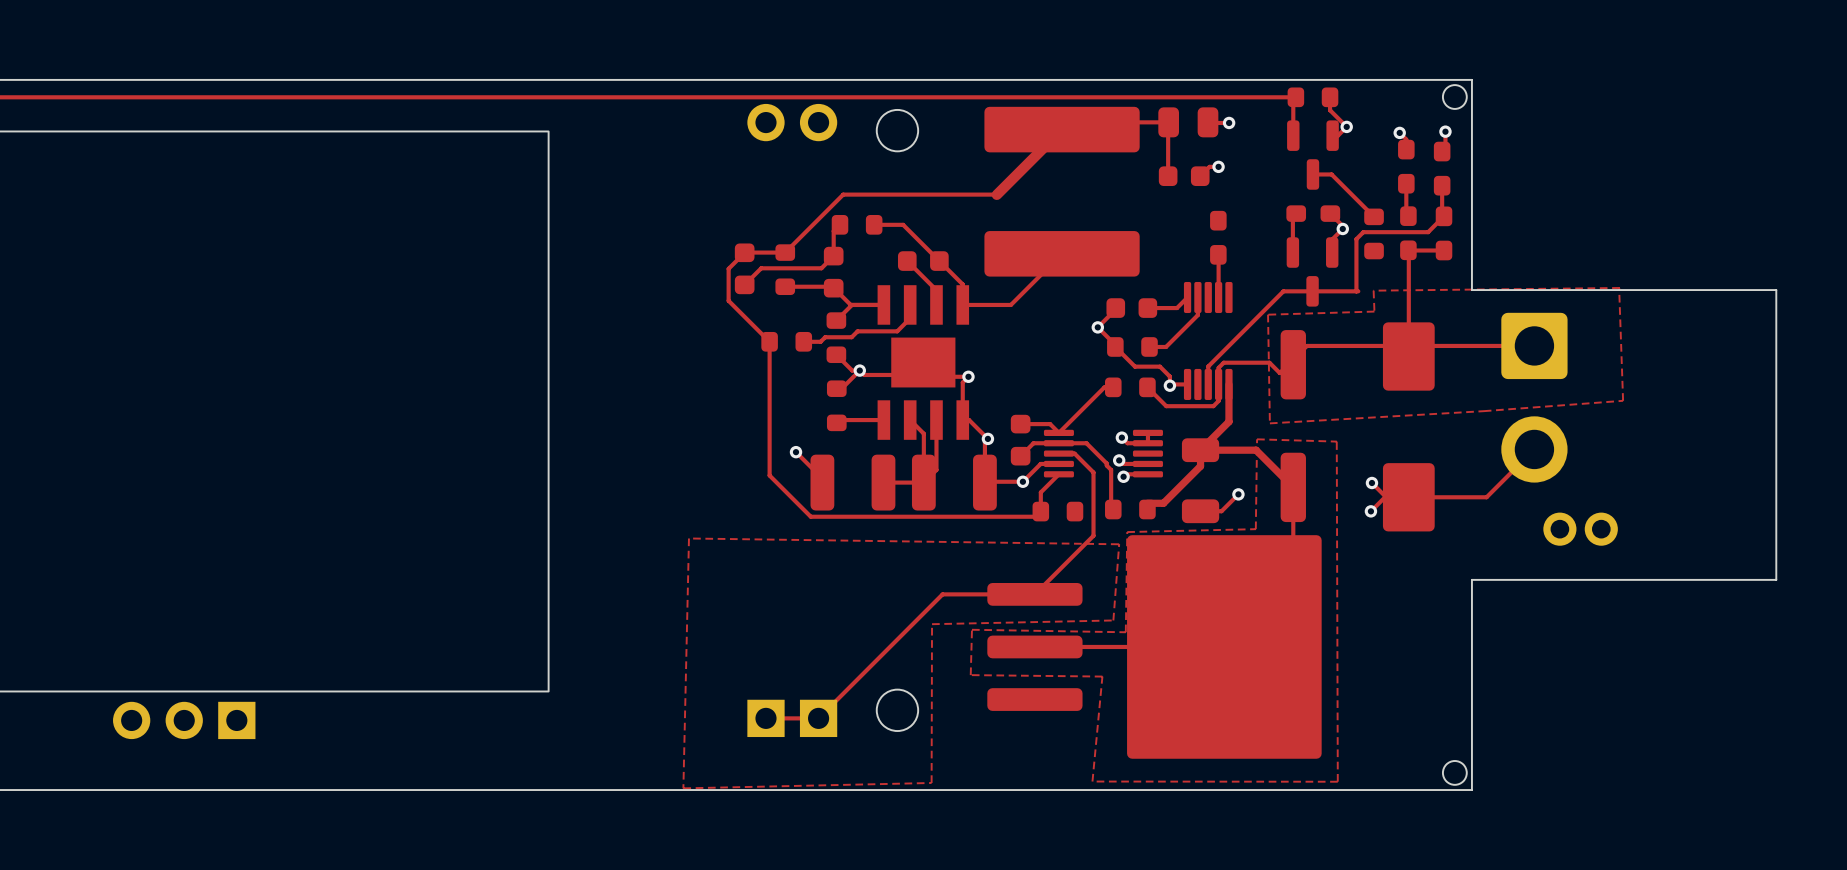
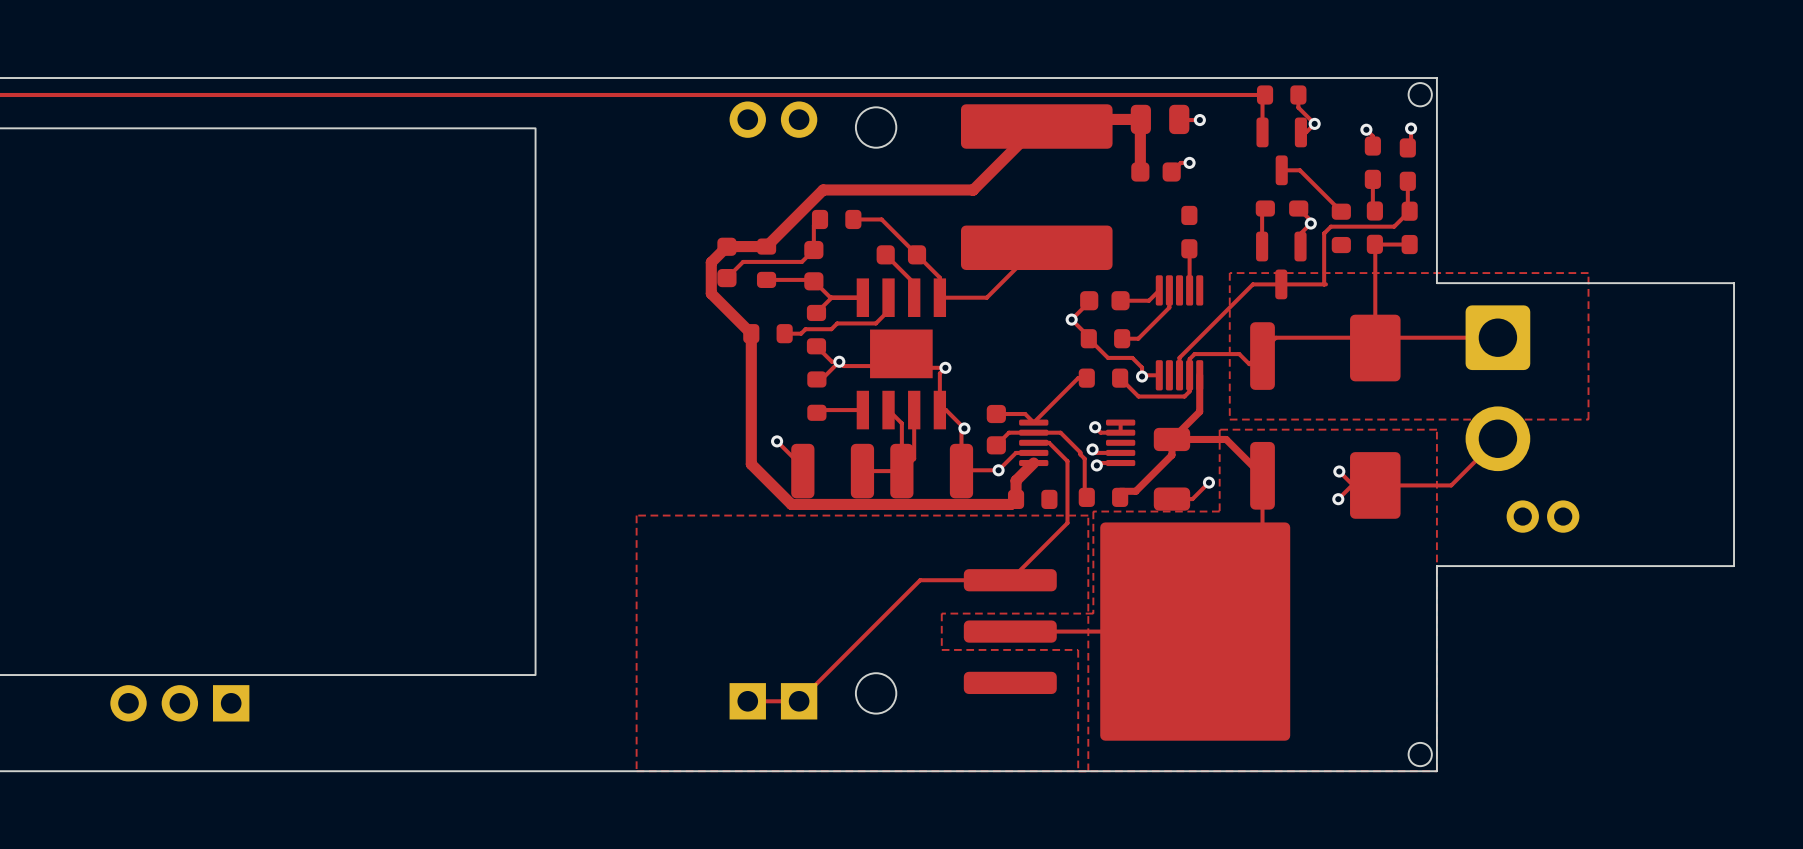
top track width: thin (1168, 176) (1168, 122) (1069, 122) (996, 194) -> thick (1140, 171) (1140, 119) (1043, 119) (973, 190)
top track width: thin (996, 194) (843, 194) (785, 252) (744, 252) (728, 268) (728, 300) (769, 341) (769, 475) (810, 516) (1035, 516) (1040, 511) (1040, 492) (1058, 474) -> thick (972, 189) (823, 189) (766, 246) (727, 246) (711, 262) (711, 293) (751, 333) (751, 464) (791, 504) (1011, 504) (1016, 499) (1016, 480) (1033, 463)
top zone outline: (1619, 287) (1373, 290) (1374, 311) (1268, 314) (1269, 423) (1623, 400) (1619, 287) -> (1588, 273) (1588, 419) (1229, 419) (1229, 273) (1588, 273)
top zone outline: (1257, 439) (1255, 529) (1127, 532) (1125, 632) (971, 629) (970, 675) (1102, 676) (1092, 781) (1337, 781) (1336, 441) (1257, 439) -> none
top zone outline: (688, 538) (1119, 544) (1113, 620) (932, 624) (931, 782) (683, 788) (688, 538) -> none
top zone outline: none -> (1088, 771) (1088, 515) (636, 515) (636, 771) (1436, 771) (1436, 429) (1219, 429) (1219, 511) (1093, 511) (1093, 613) (941, 613) (941, 649) (1078, 649) (1078, 771)

